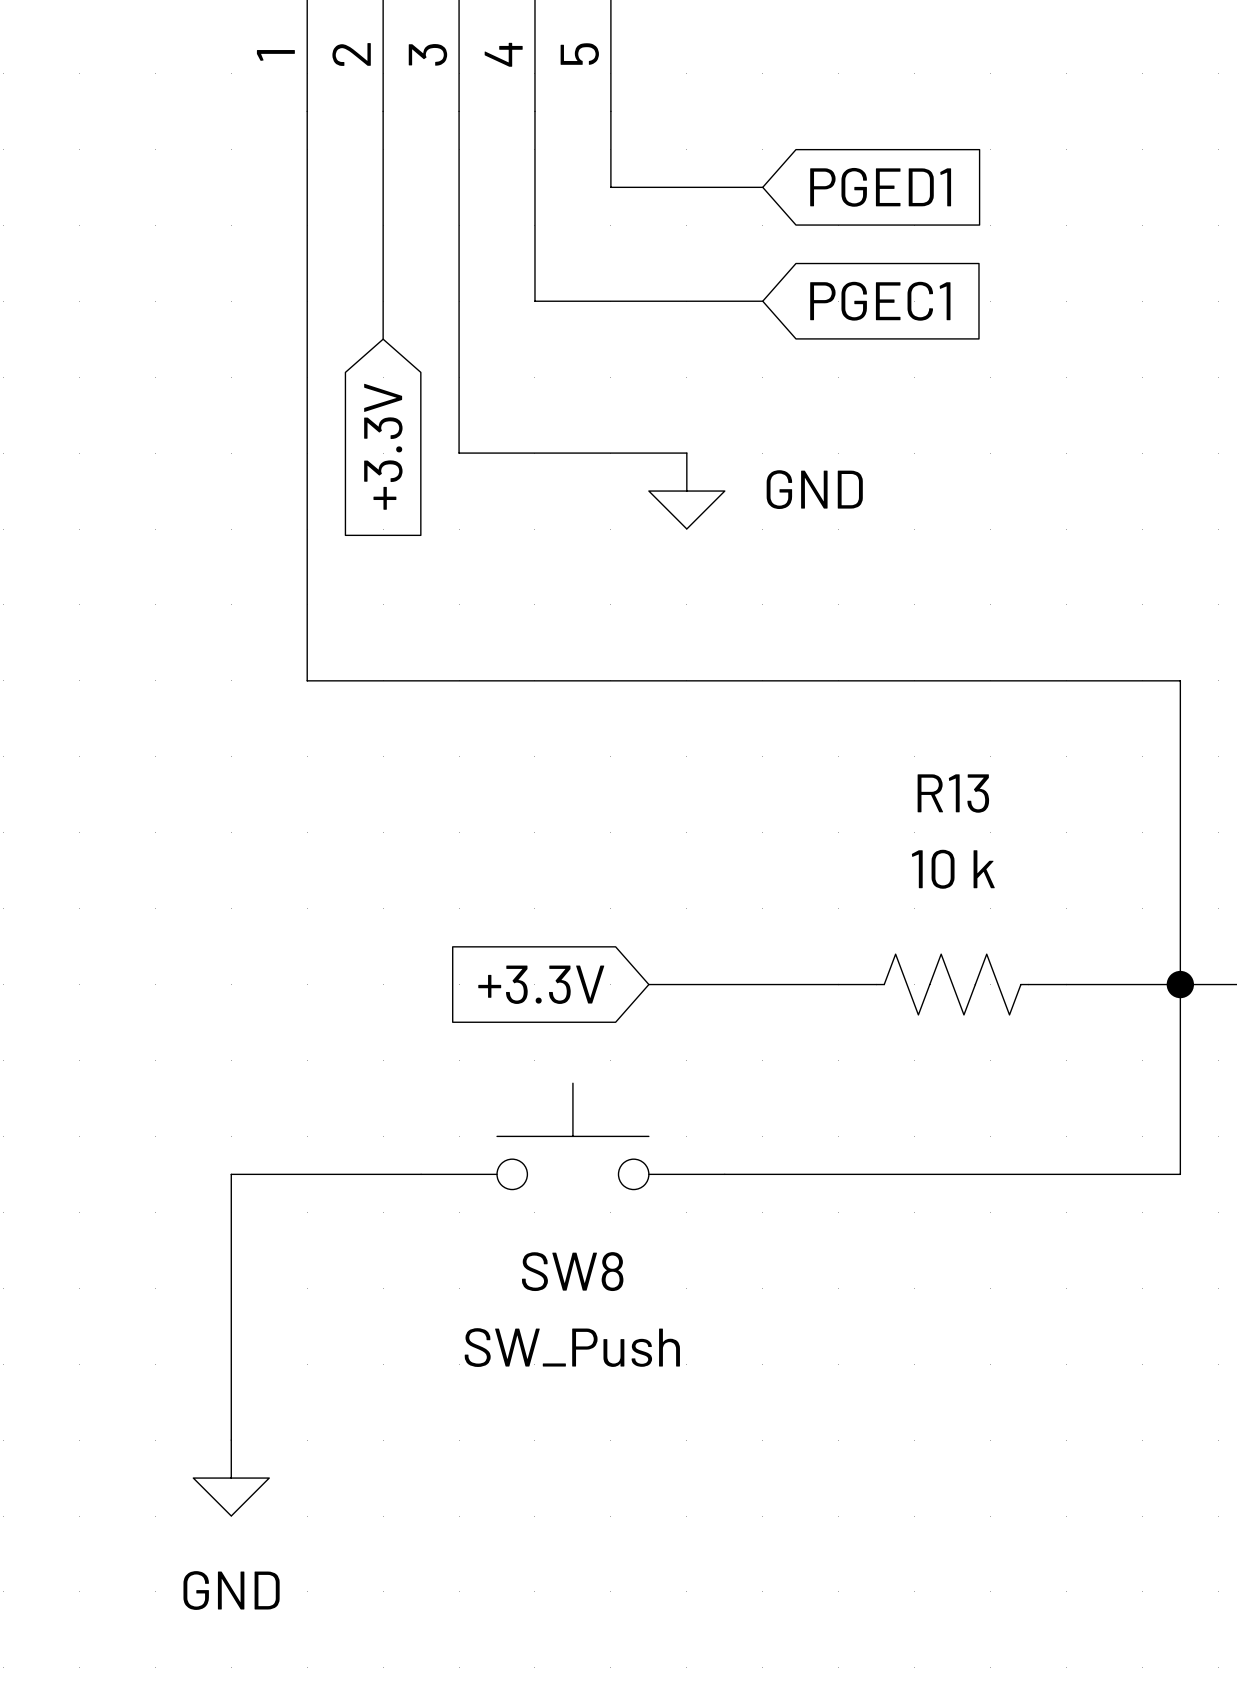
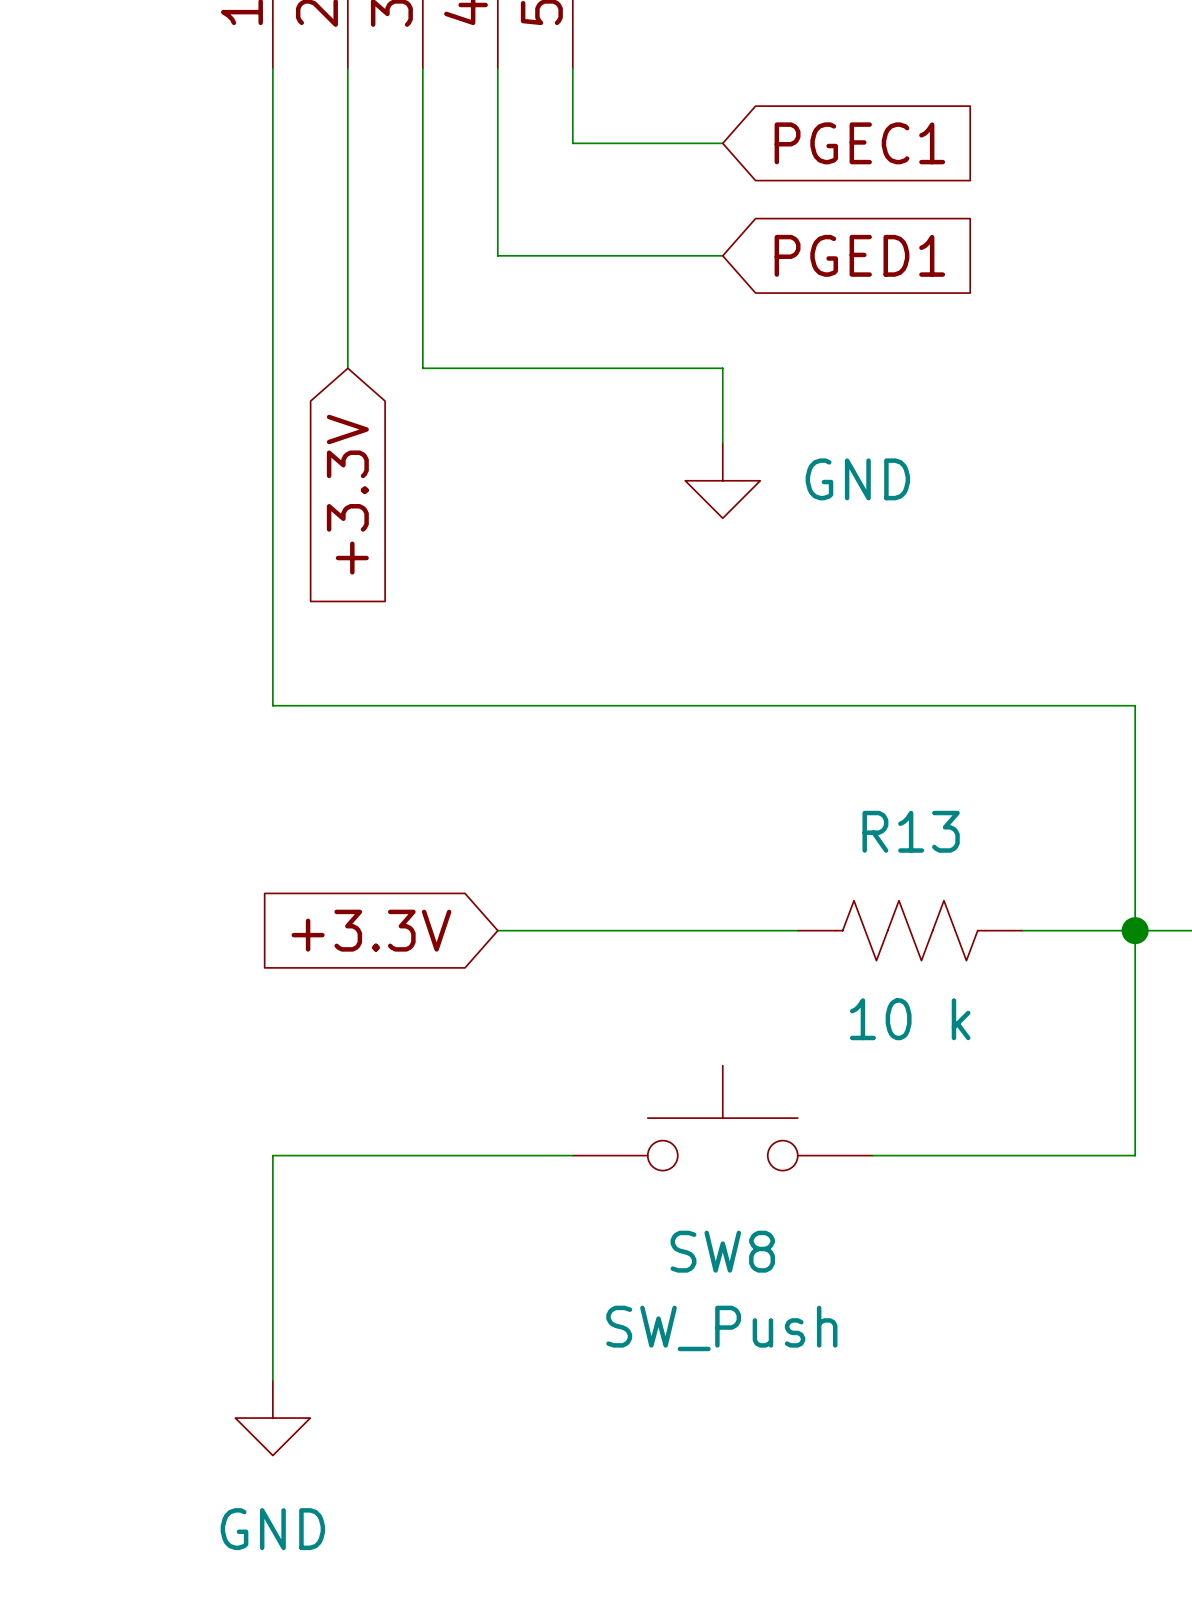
global label: PGED1 (880, 187) -> PGEC1 (859, 143)
global label: PGEC1 (880, 301) -> PGED1 (859, 255)
wire: none -> (347, 293) (347, 368)
wire: (459, 415) (459, 453) (686, 453) -> (422, 368) (722, 368) (722, 443)
global label position: +3.3V (383, 446) -> +3.3V (347, 494)
power symbol position: GND (686, 491) -> GND (722, 480)
wire: (307, 680) (1180, 680) (1180, 756) -> (272, 630) (272, 705) (1135, 705)
R13 name position: R13 (953, 793) -> R13 (911, 831)
R13 value position: 10 k (953, 869) -> 10 k (910, 1019)
wire: none -> (497, 930) (610, 930)
global label position: +3.3V (541, 984) -> +3.3V (371, 930)
SW8 position: (572, 1136) -> (722, 1118)
wire: (421, 1174) (231, 1174) (231, 1440) -> none
wire: (724, 1174) (1180, 1174) -> (872, 1155) (1135, 1155) (1135, 1118)
wire: none -> (572, 1155) (272, 1155) (272, 1380)
power symbol position: GND (231, 1478) -> GND (272, 1418)

